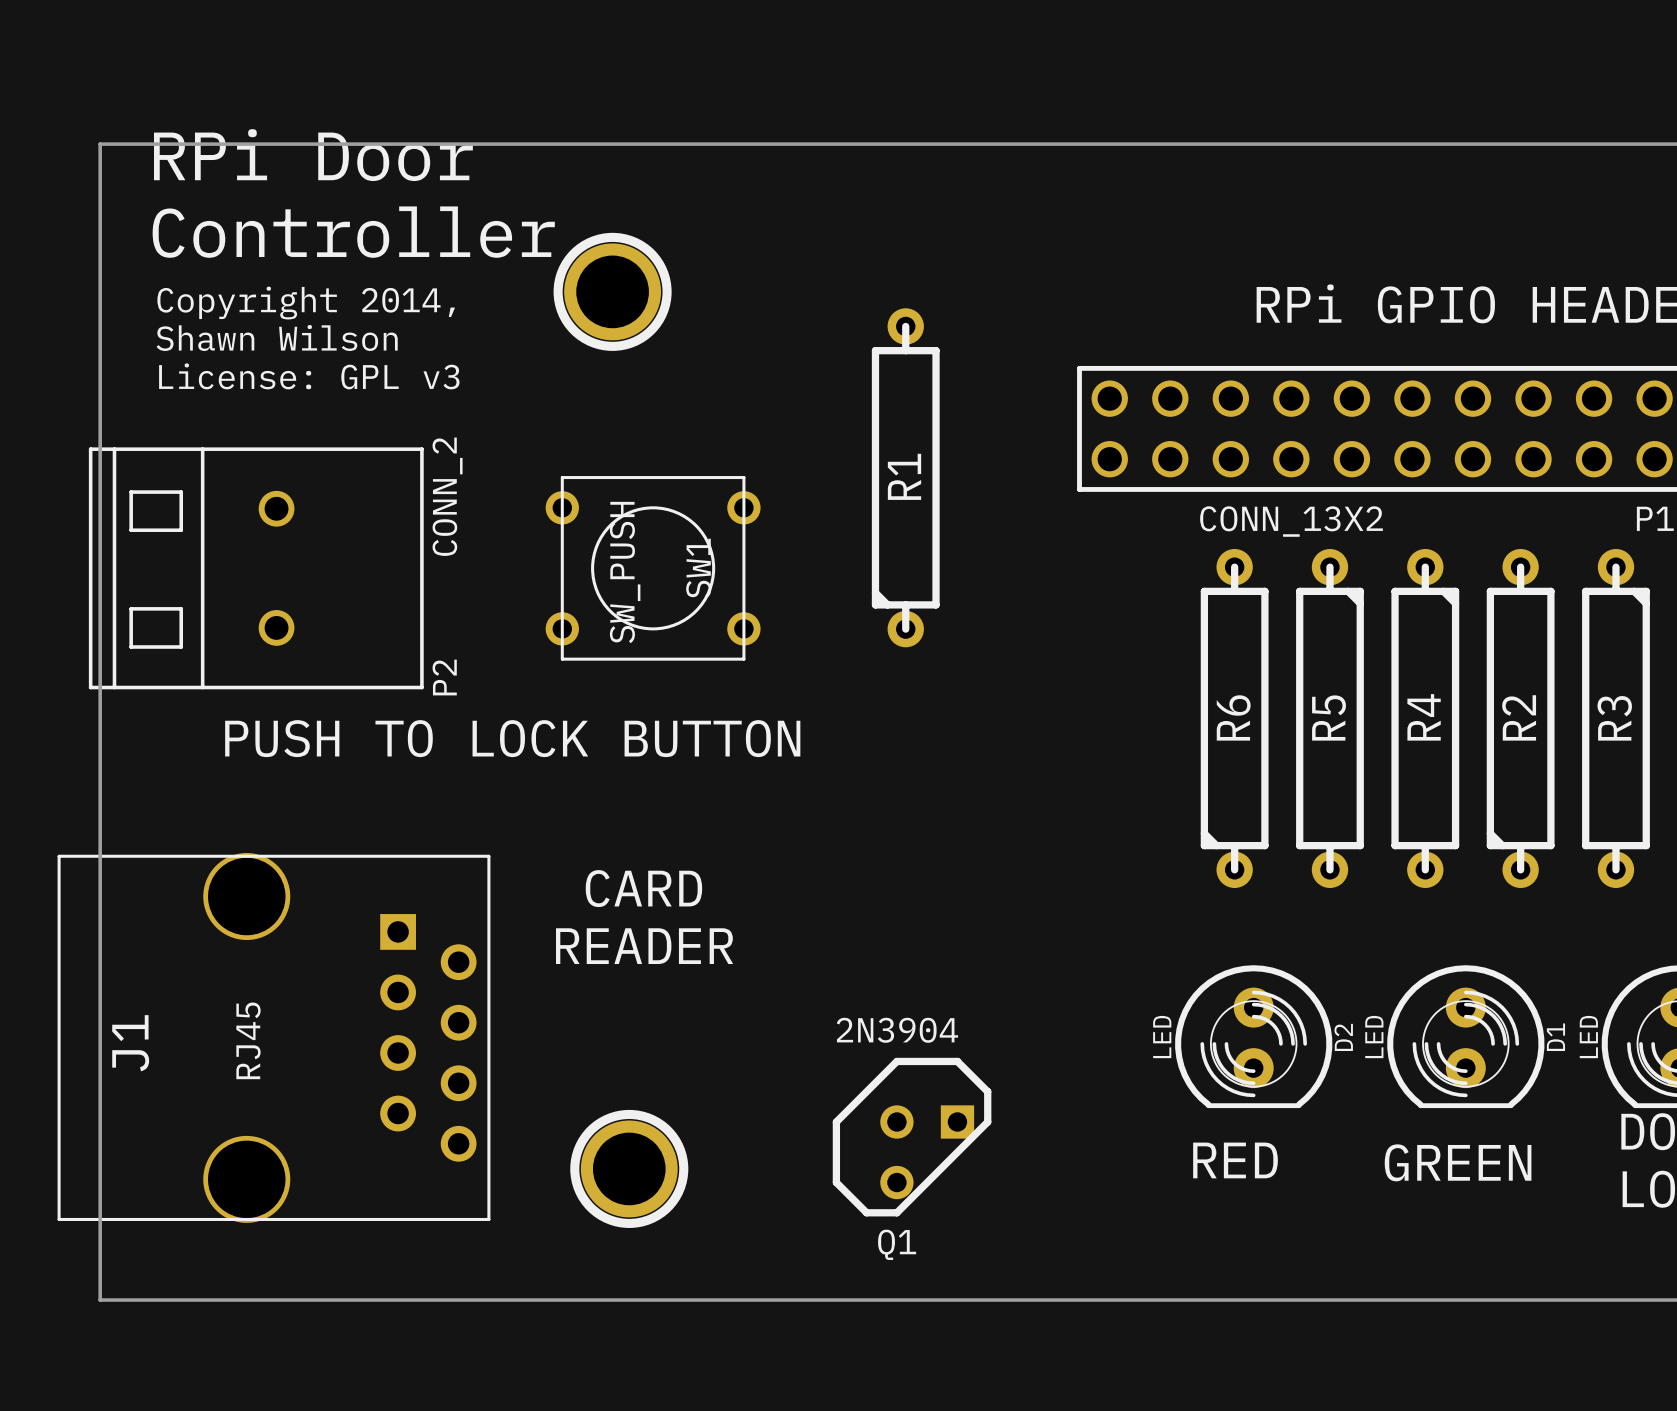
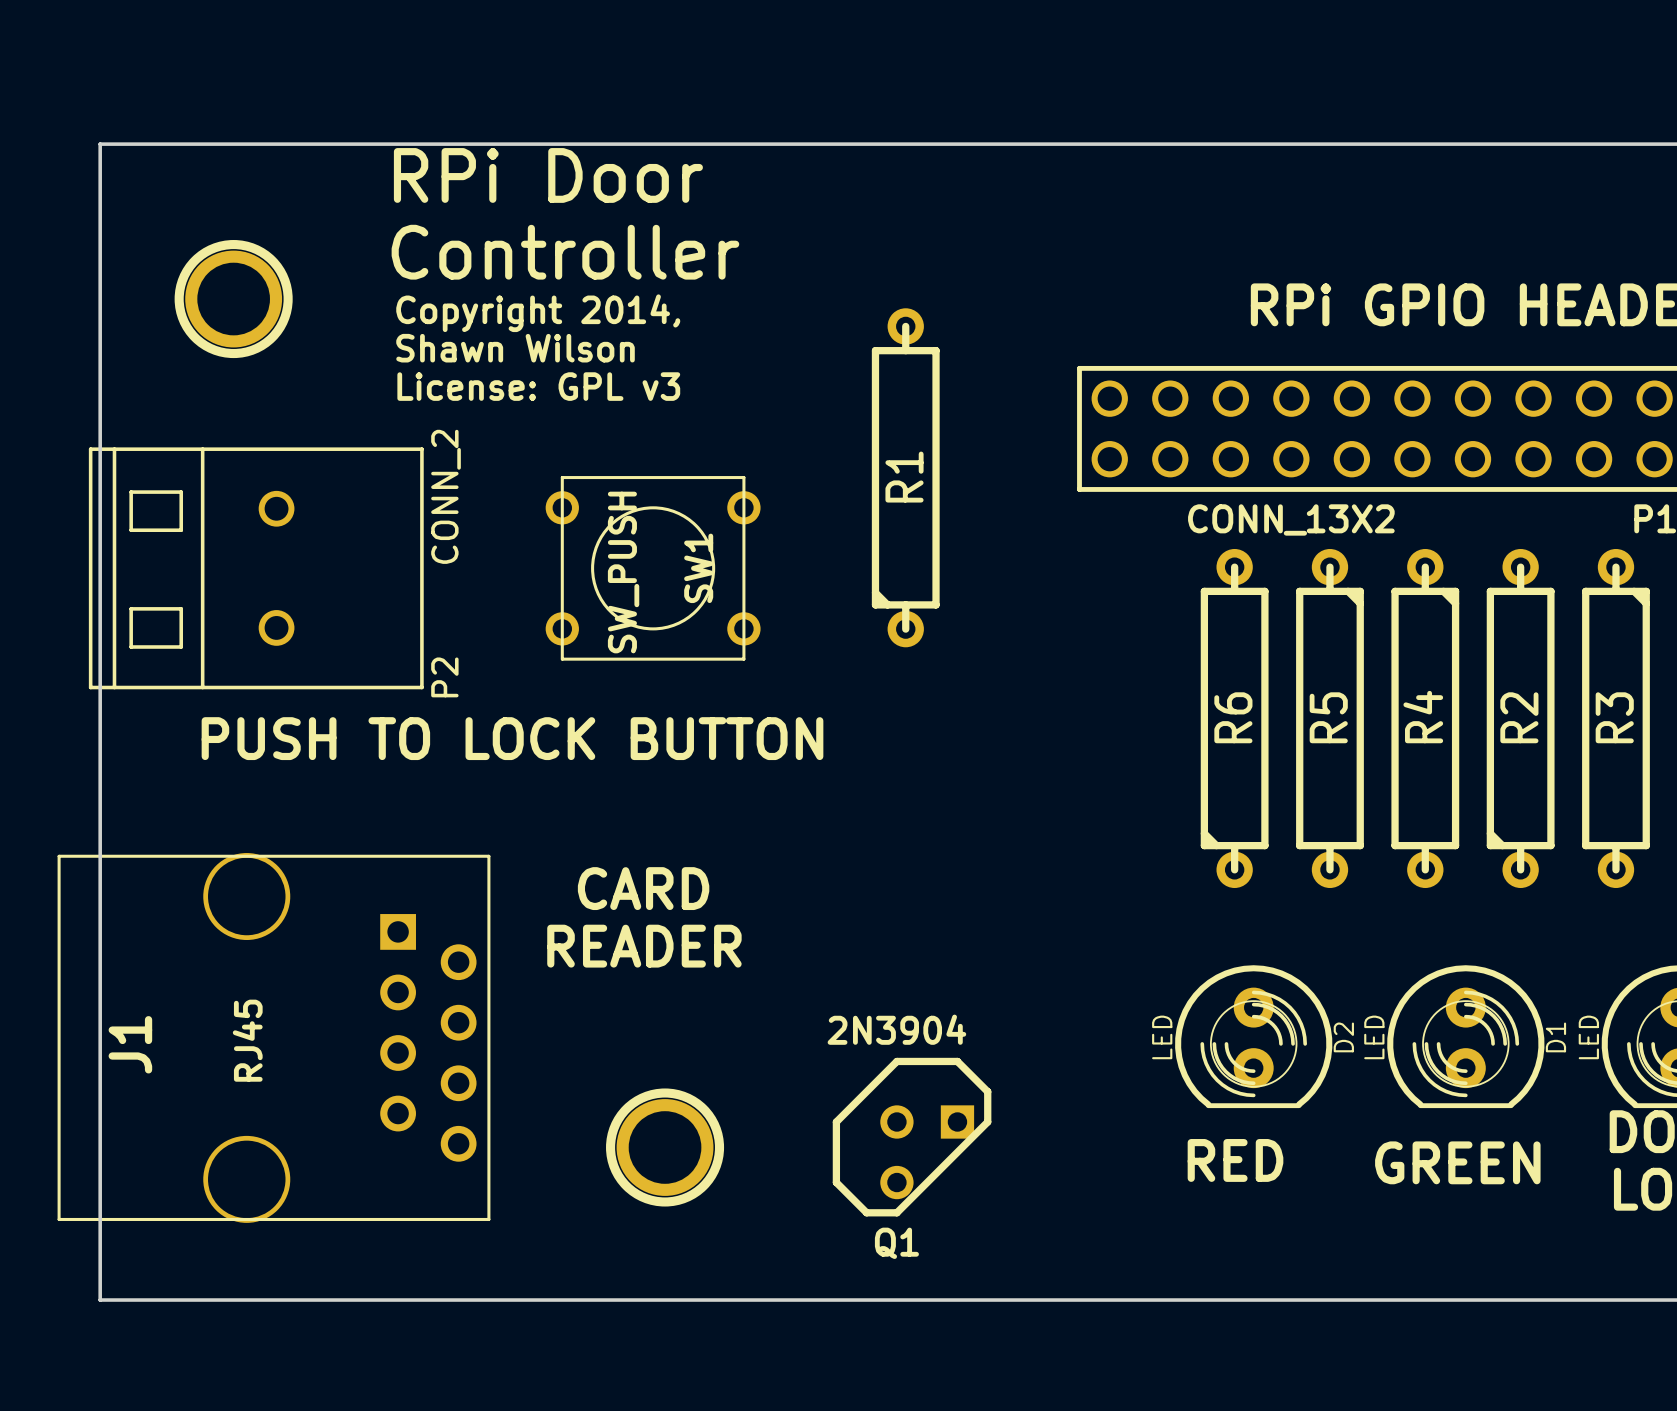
text position: RPi Door (313, 155) -> RPi Door (548, 175)
text position: Controller (353, 232) -> Controller (565, 252)
part position: (612, 291) -> (233, 299)
text position: Copyright 2014, (306, 303) -> Copyright 2014, (538, 313)
text position: Shawn Wilson (277, 338) -> Shawn Wilson (515, 348)
text position: License: GPL v3 (309, 376) -> License: GPL v3 (538, 386)
part position: (629, 1168) -> (665, 1147)

